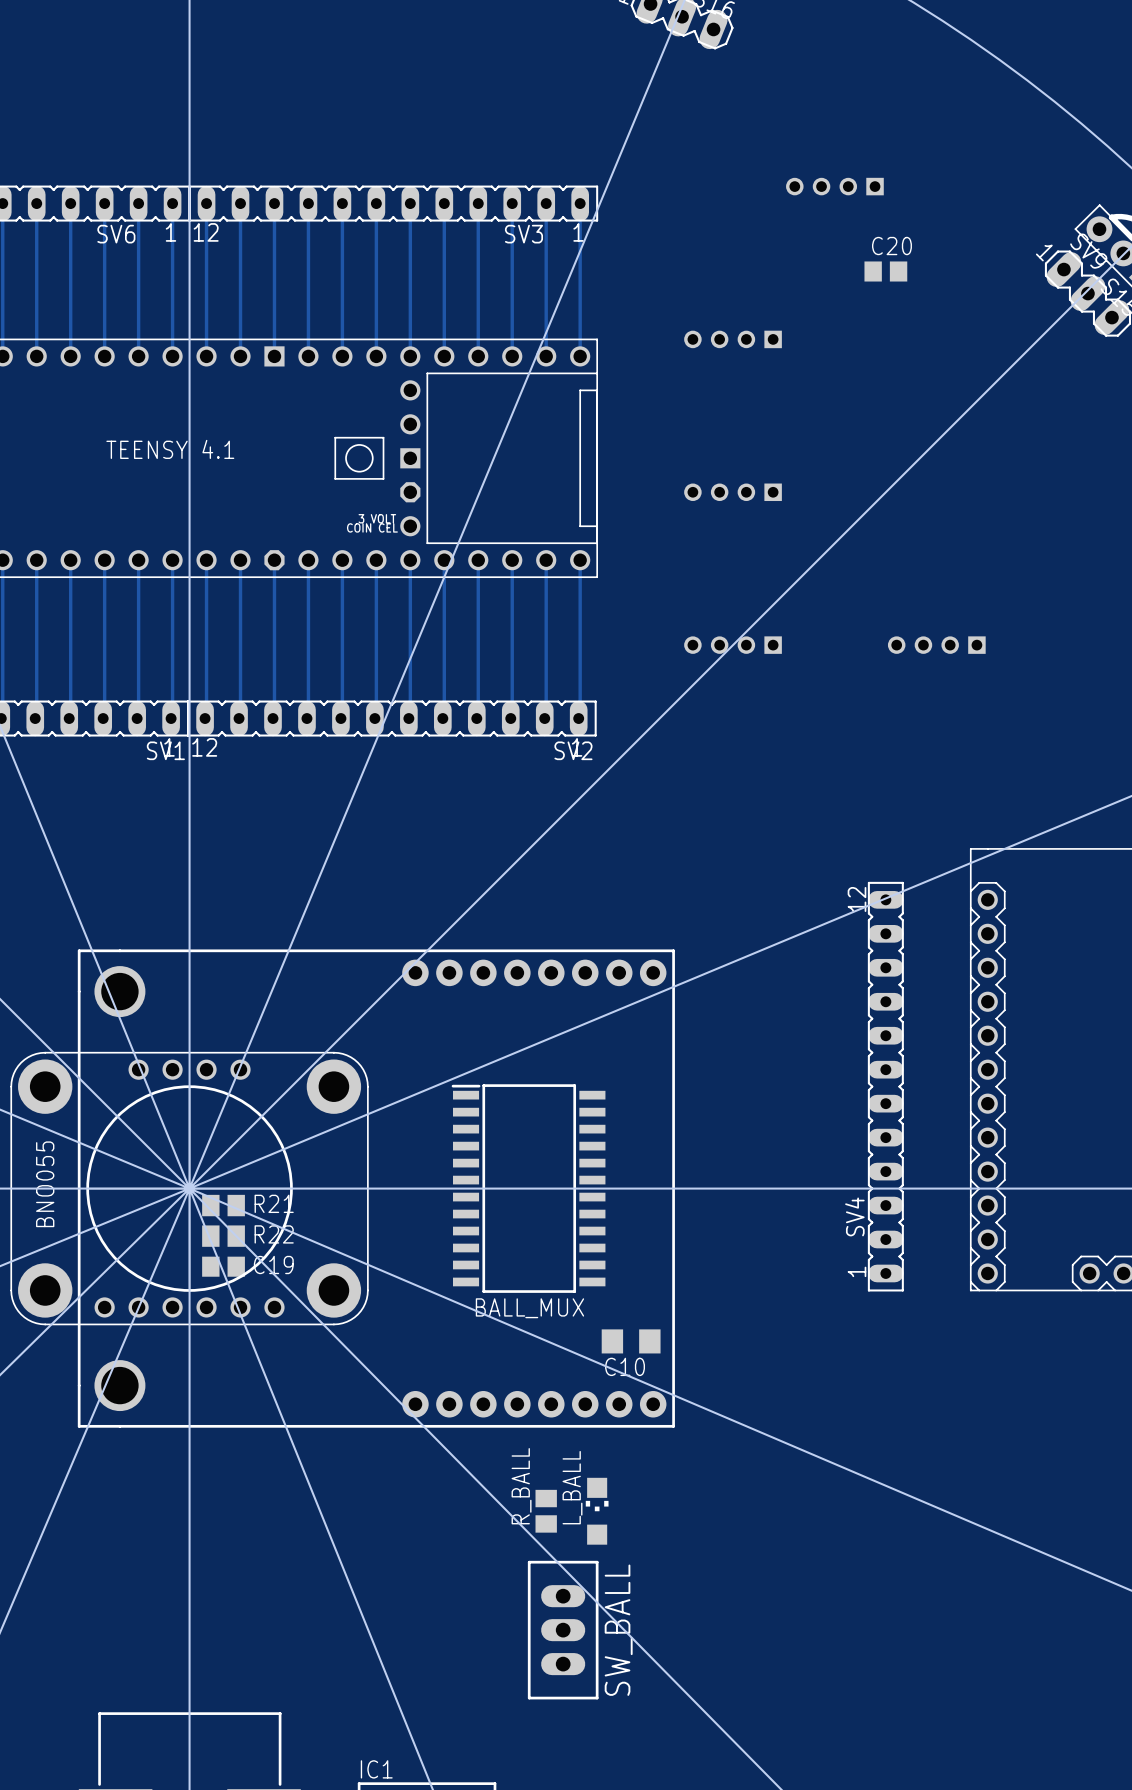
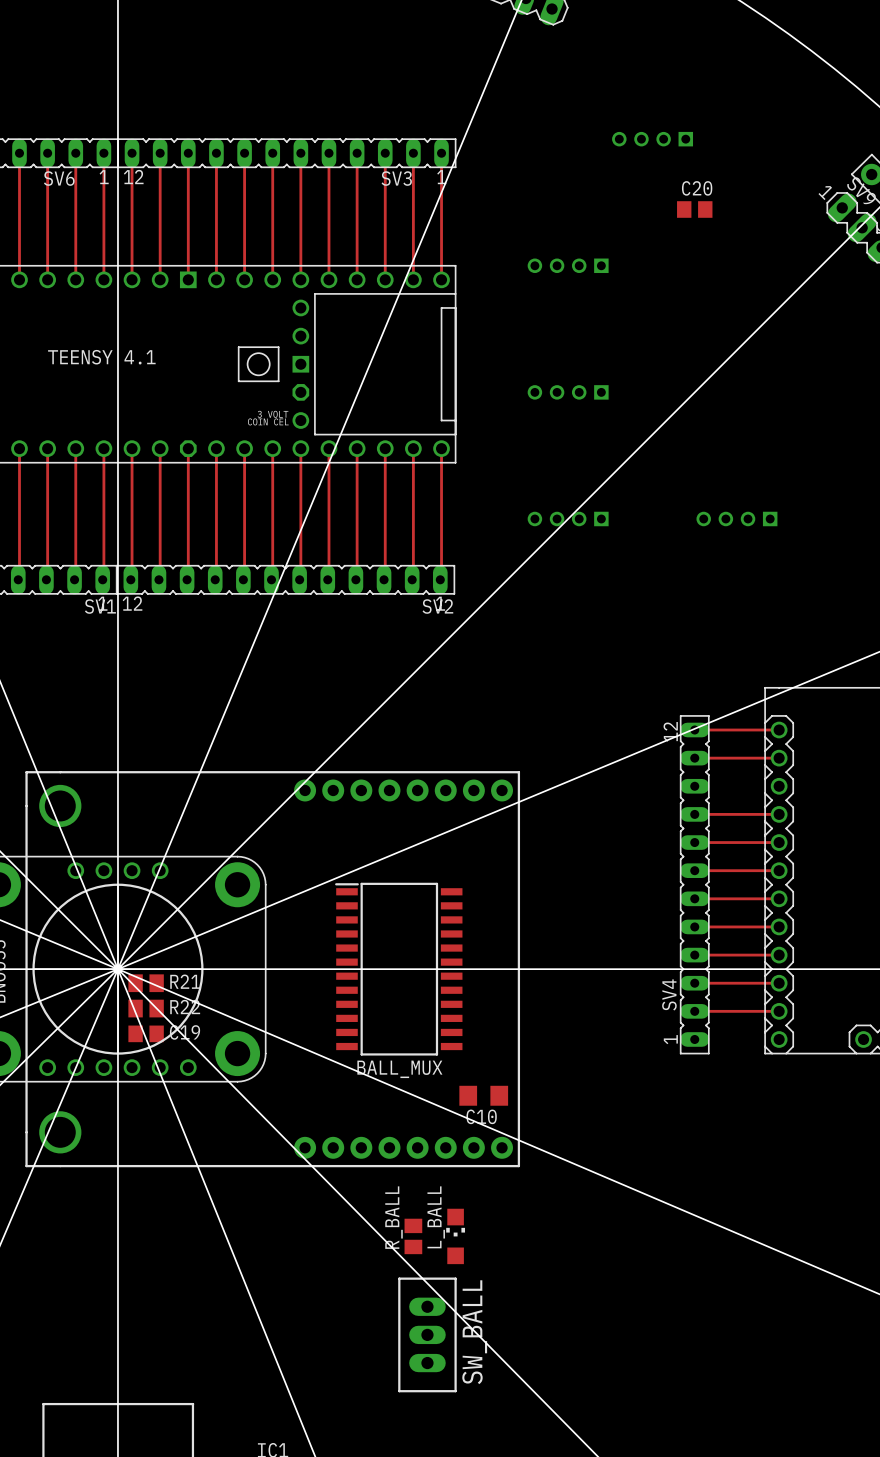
track: none -> (694, 730) (779, 730)
track: none -> (694, 758) (779, 758)
track: none -> (694, 814) (779, 814)
track: none -> (694, 842) (779, 842)
track: none -> (694, 870) (779, 870)
track: none -> (694, 898) (779, 898)
track: none -> (694, 926) (779, 926)
track: none -> (694, 955) (779, 955)
track: none -> (694, 983) (779, 983)
track: none -> (694, 1011) (779, 1011)

